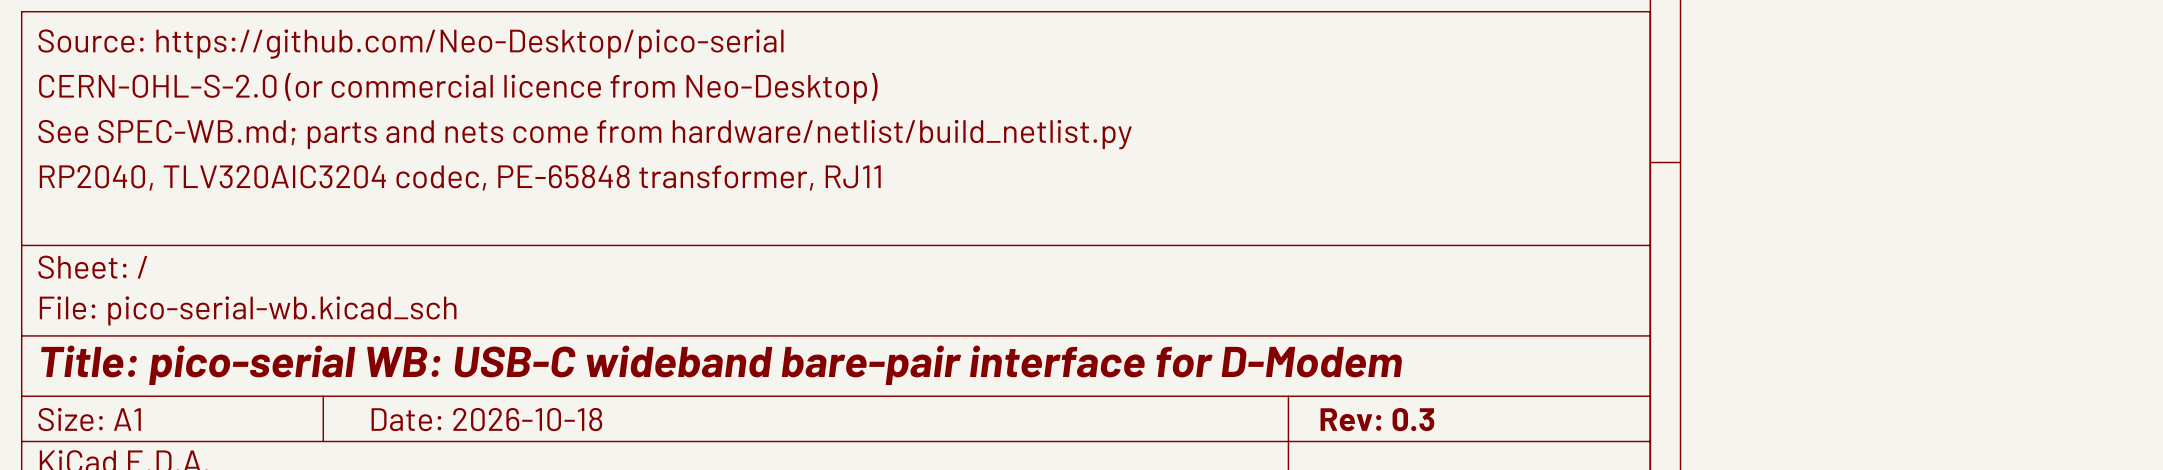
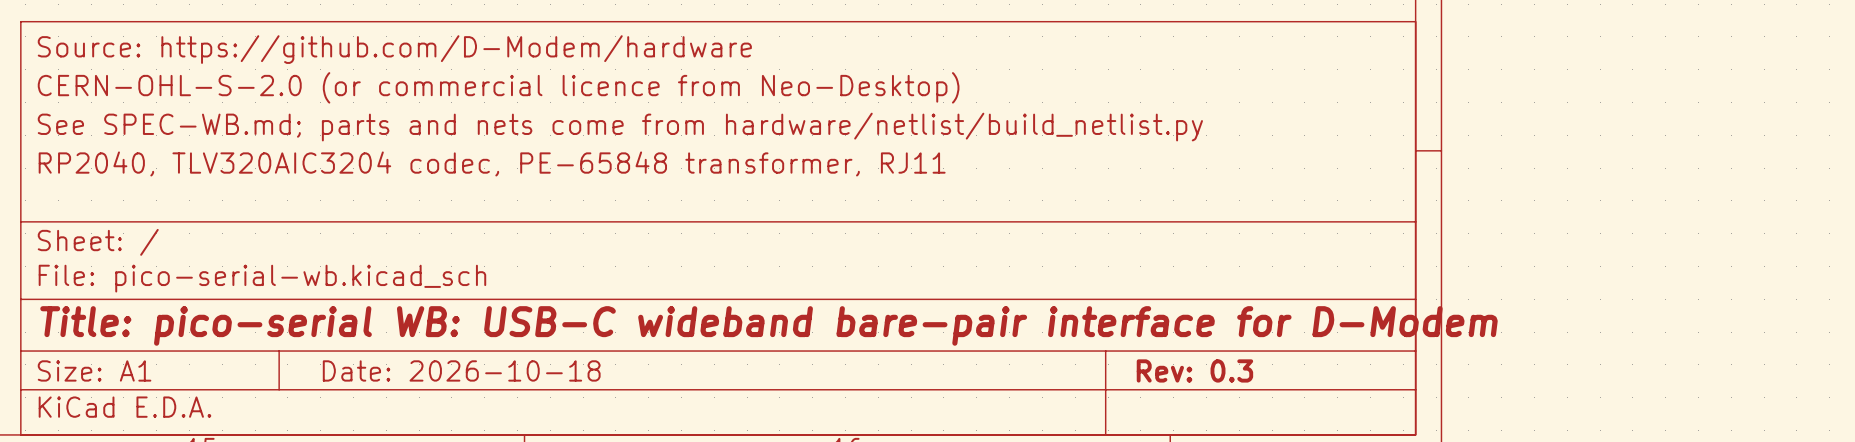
title block: Source: https://github.com/Neo-Desktop/pico-serial (410, 44) -> Source: https://github.com/D-Modem/hardware (394, 49)

